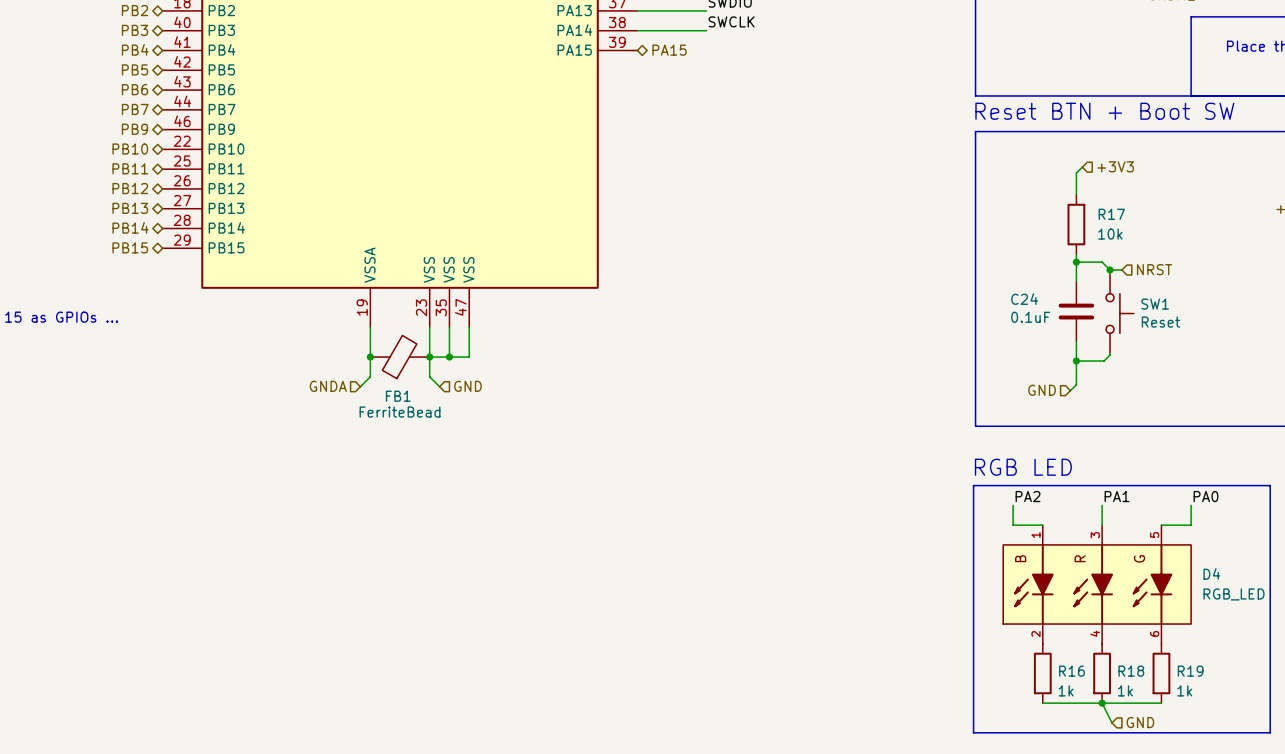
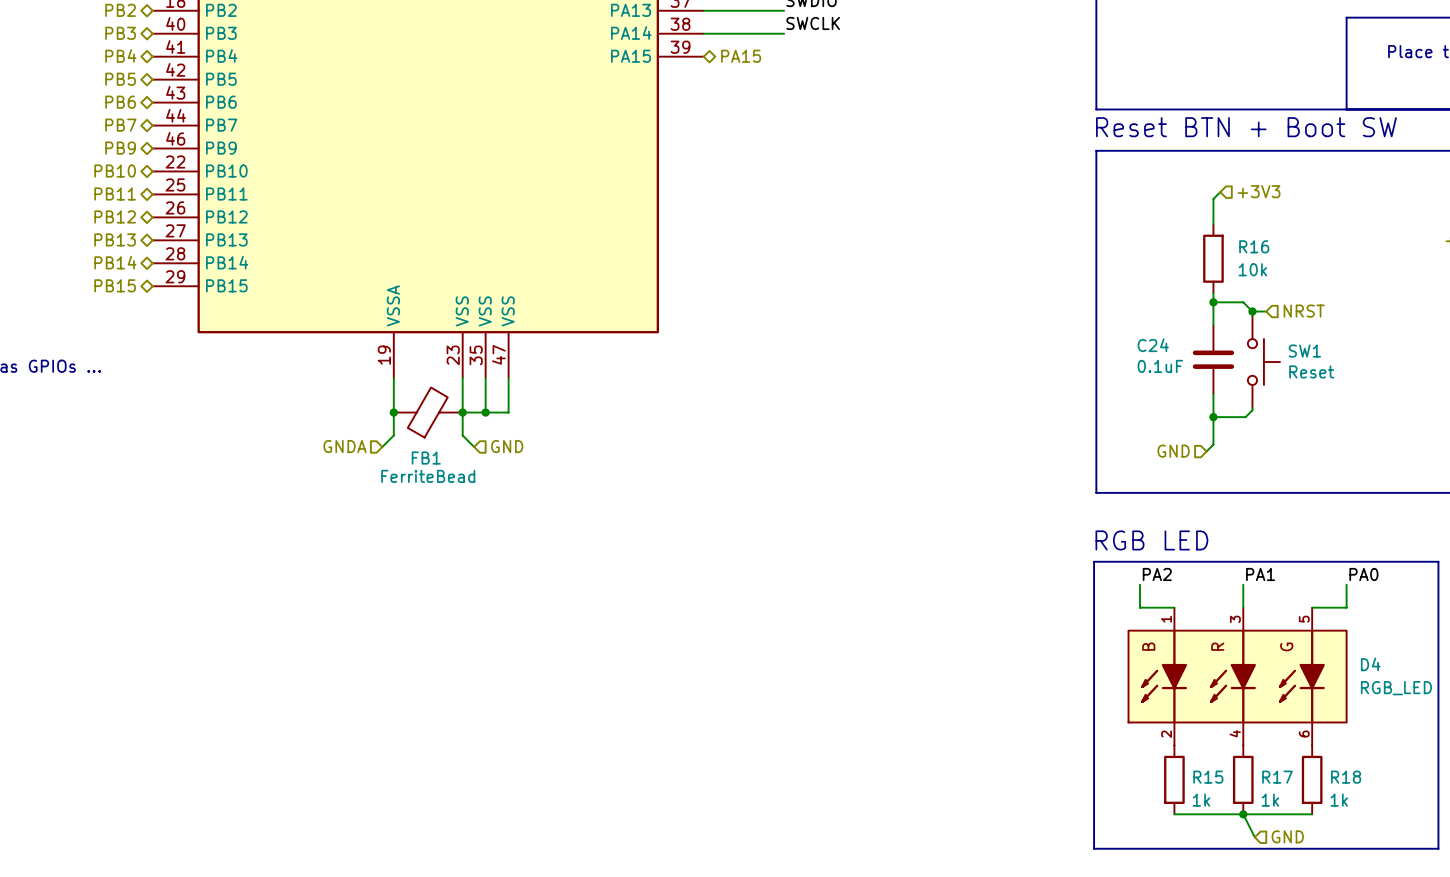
R17 name: R17 (1111, 214) -> R16 (1254, 246)
R16 name: R16 (1072, 671) -> R15 (1208, 777)
R18 name: R18 (1131, 671) -> R17 (1277, 777)
R19 name: R19 (1190, 671) -> R18 (1346, 777)

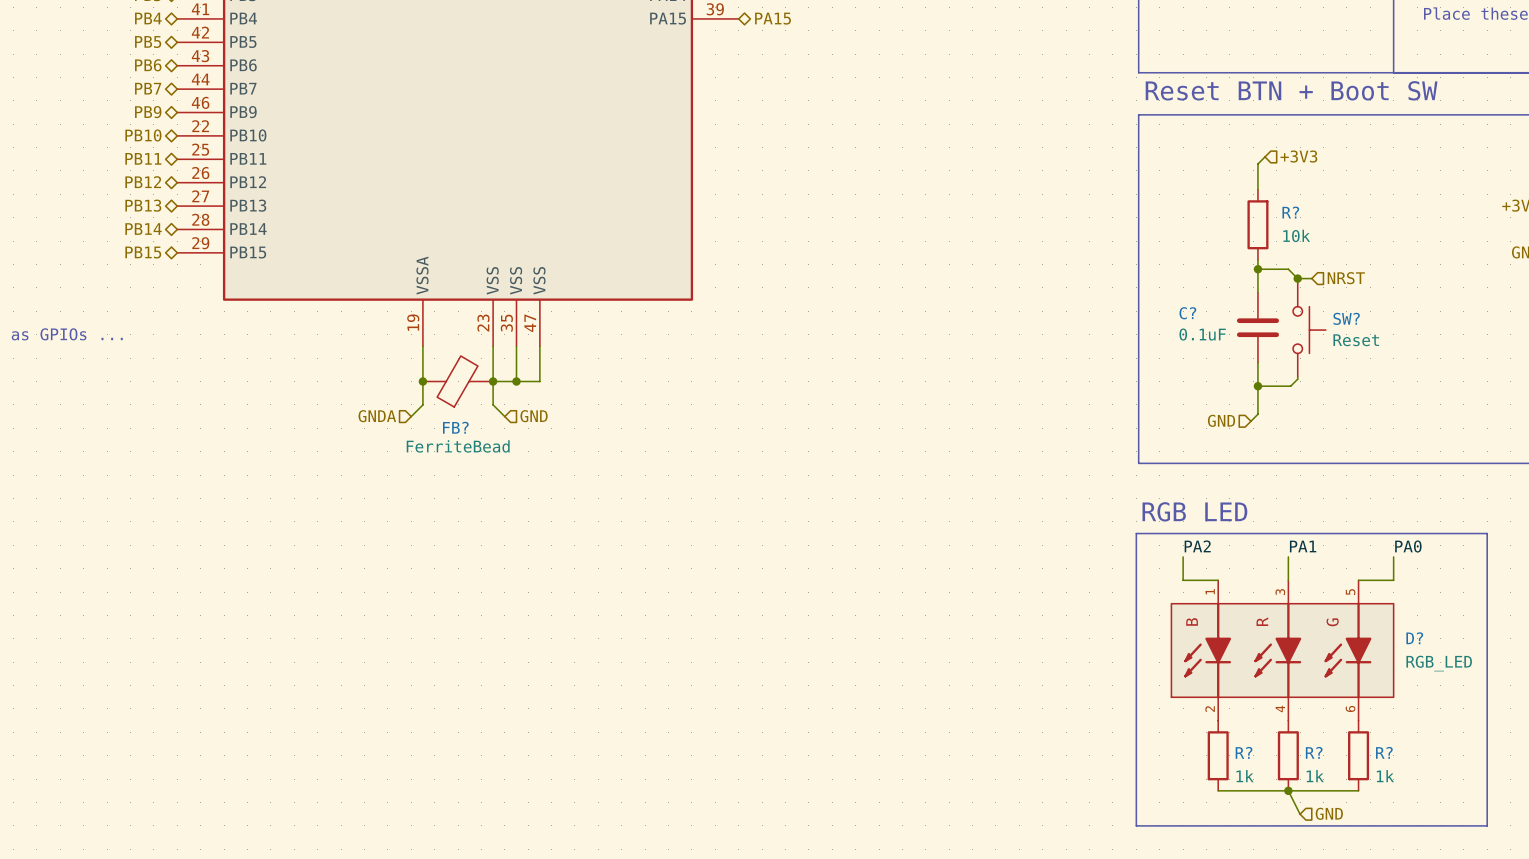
R16 name: R16 (1254, 246) -> R? (1290, 212)
C24 name: C24 (1153, 345) -> C? (1187, 313)
SW1 name: SW1 (1304, 351) -> SW? (1346, 318)
FB1 name: FB1 (426, 458) -> FB? (455, 427)
D4 name: D4 (1370, 664) -> D? (1414, 638)
R15 name: R15 (1208, 777) -> R? (1244, 752)
R17 name: R17 (1277, 777) -> R? (1314, 752)
R18 name: R18 (1346, 777) -> R? (1384, 752)

